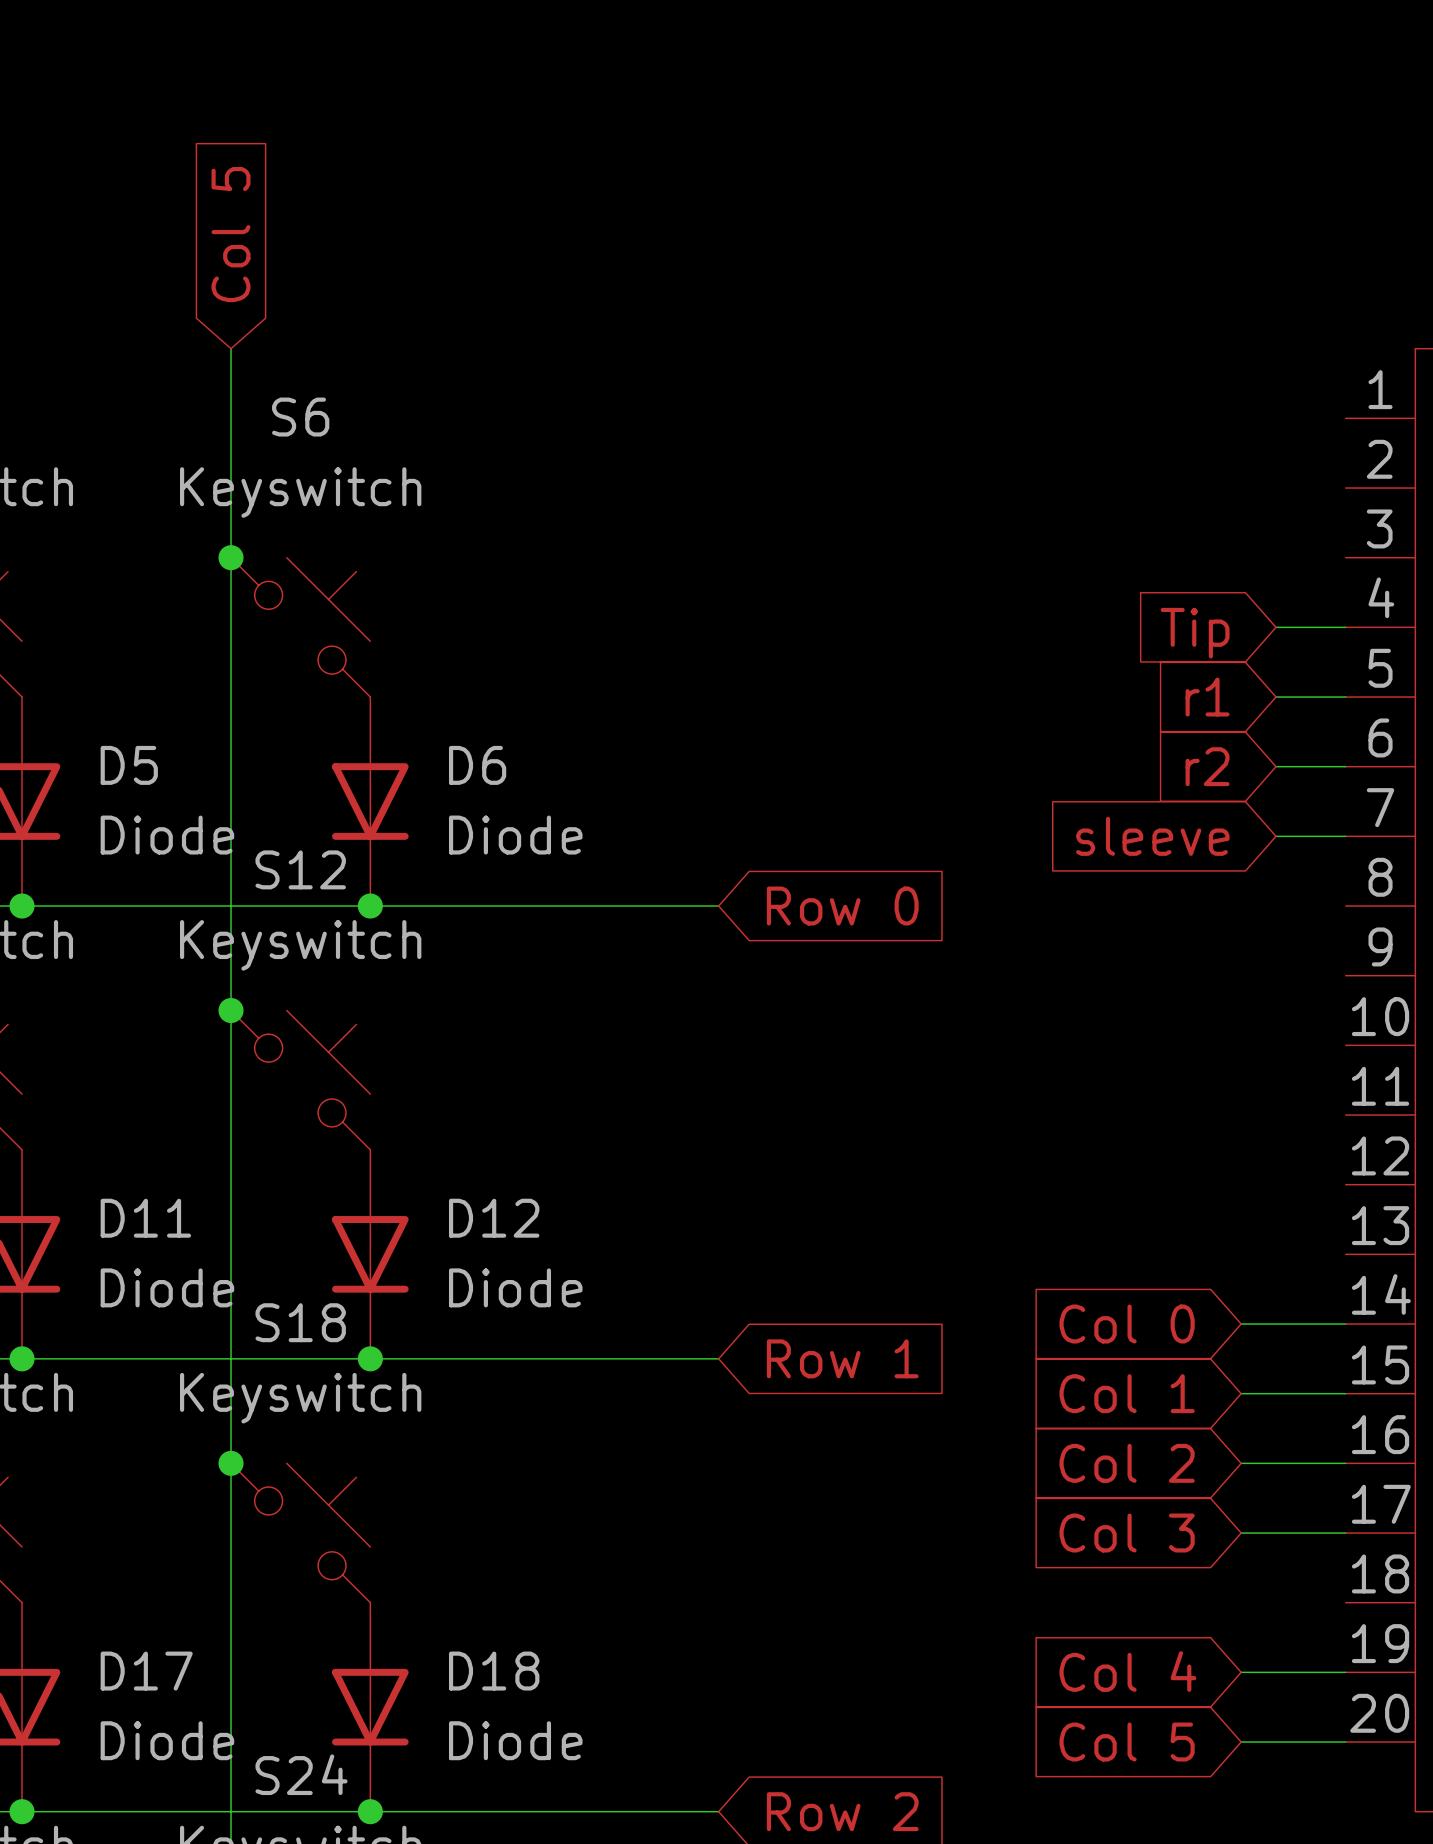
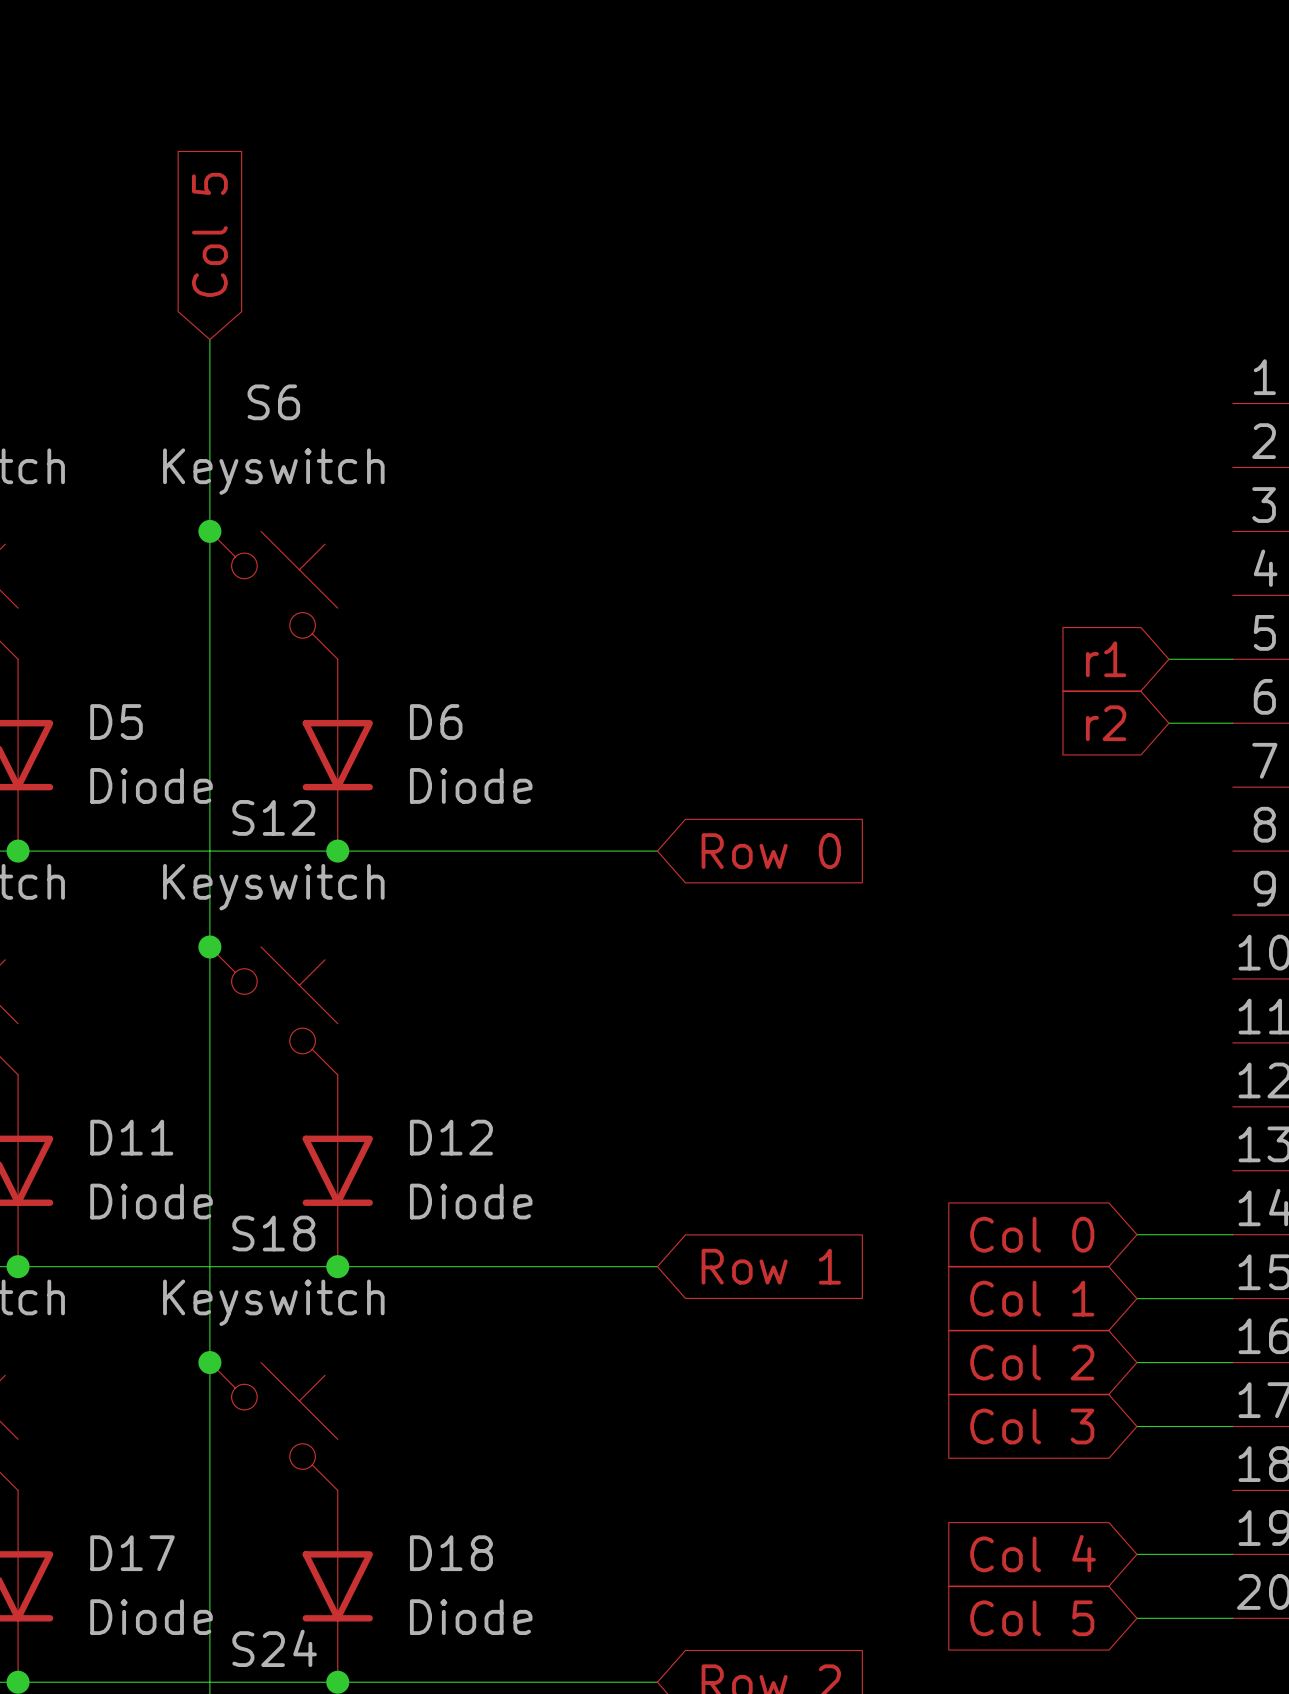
wire: (1276, 627) (1345, 627) -> none
global label: Tip (1195, 633) -> none
global label: sleeve (1152, 836) -> none
wire: (1276, 836) (1345, 836) -> none

